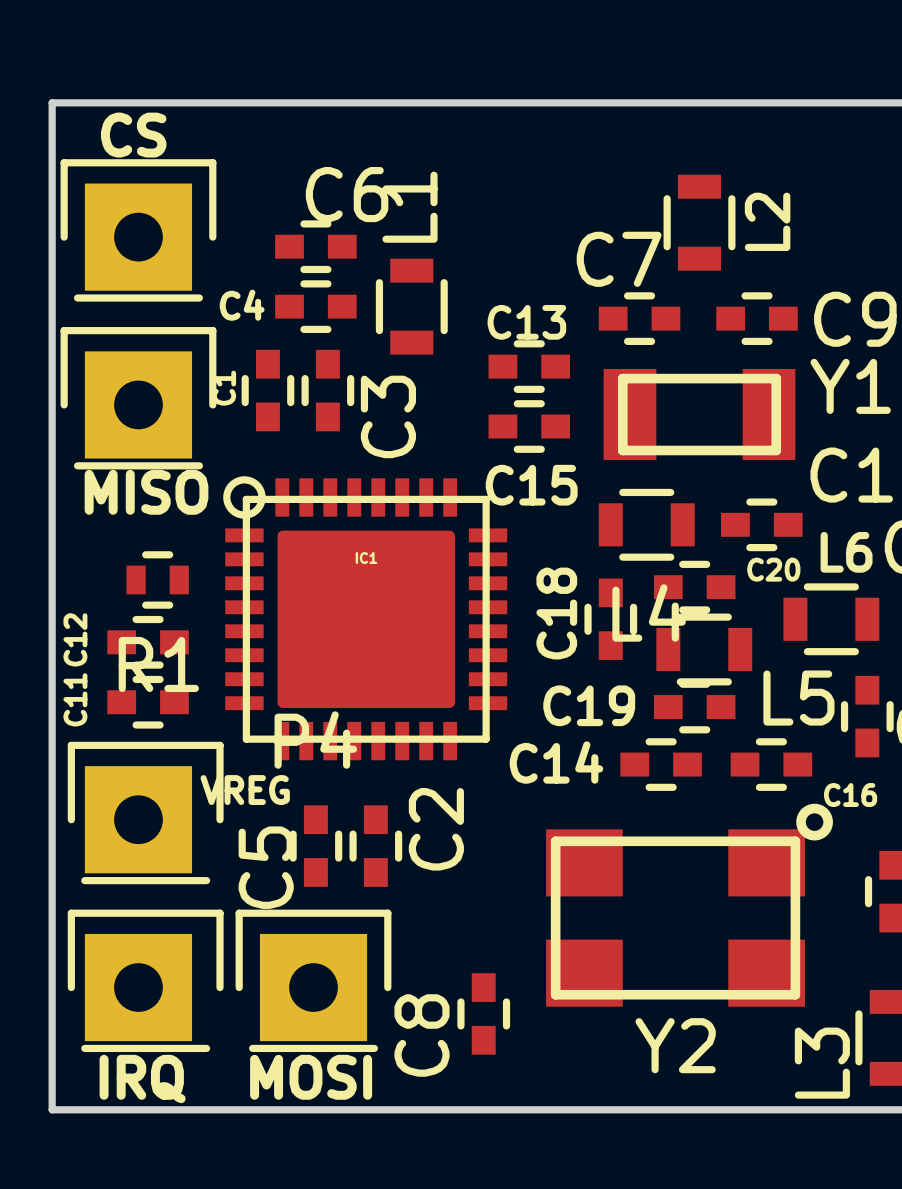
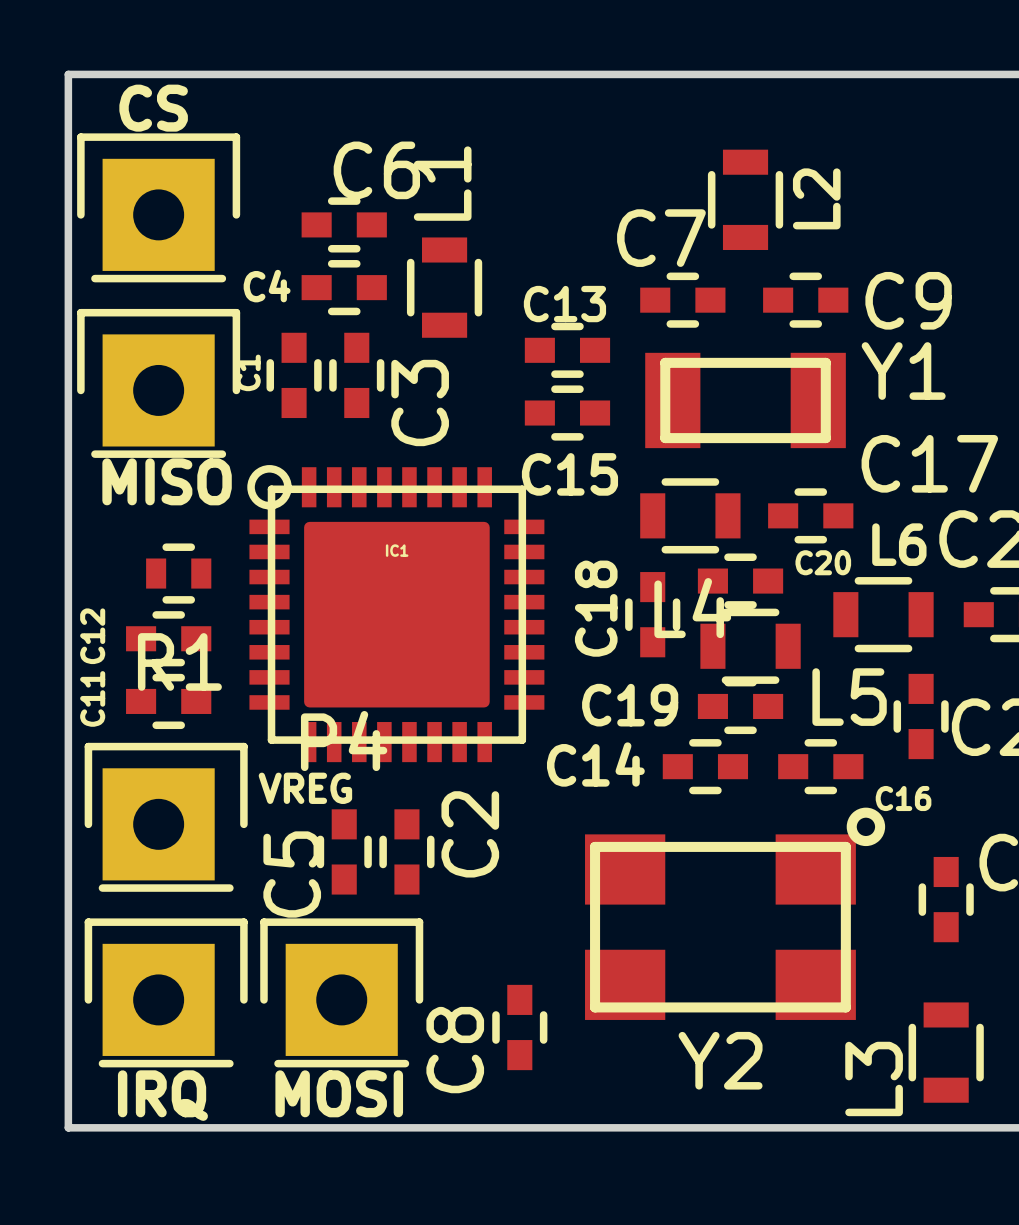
text position: VREG (245, 790) -> VREG (305, 788)

